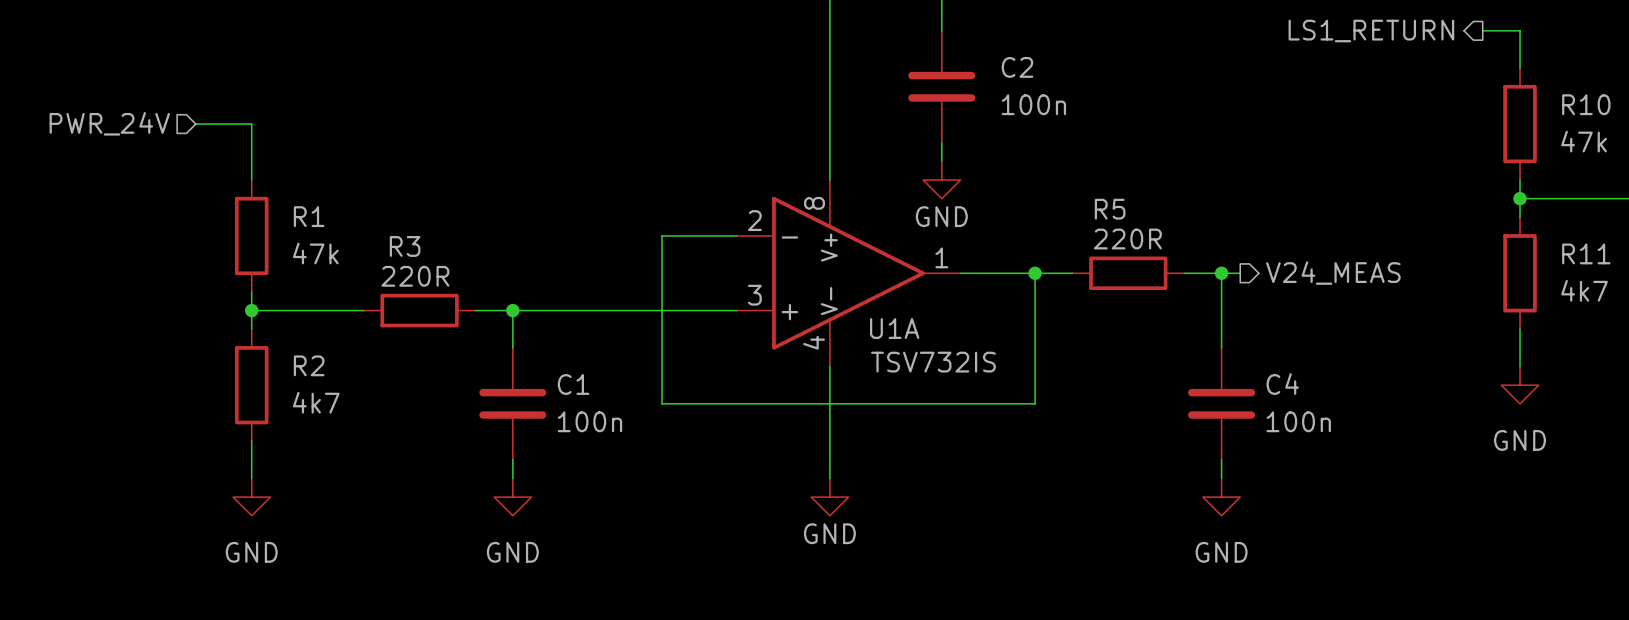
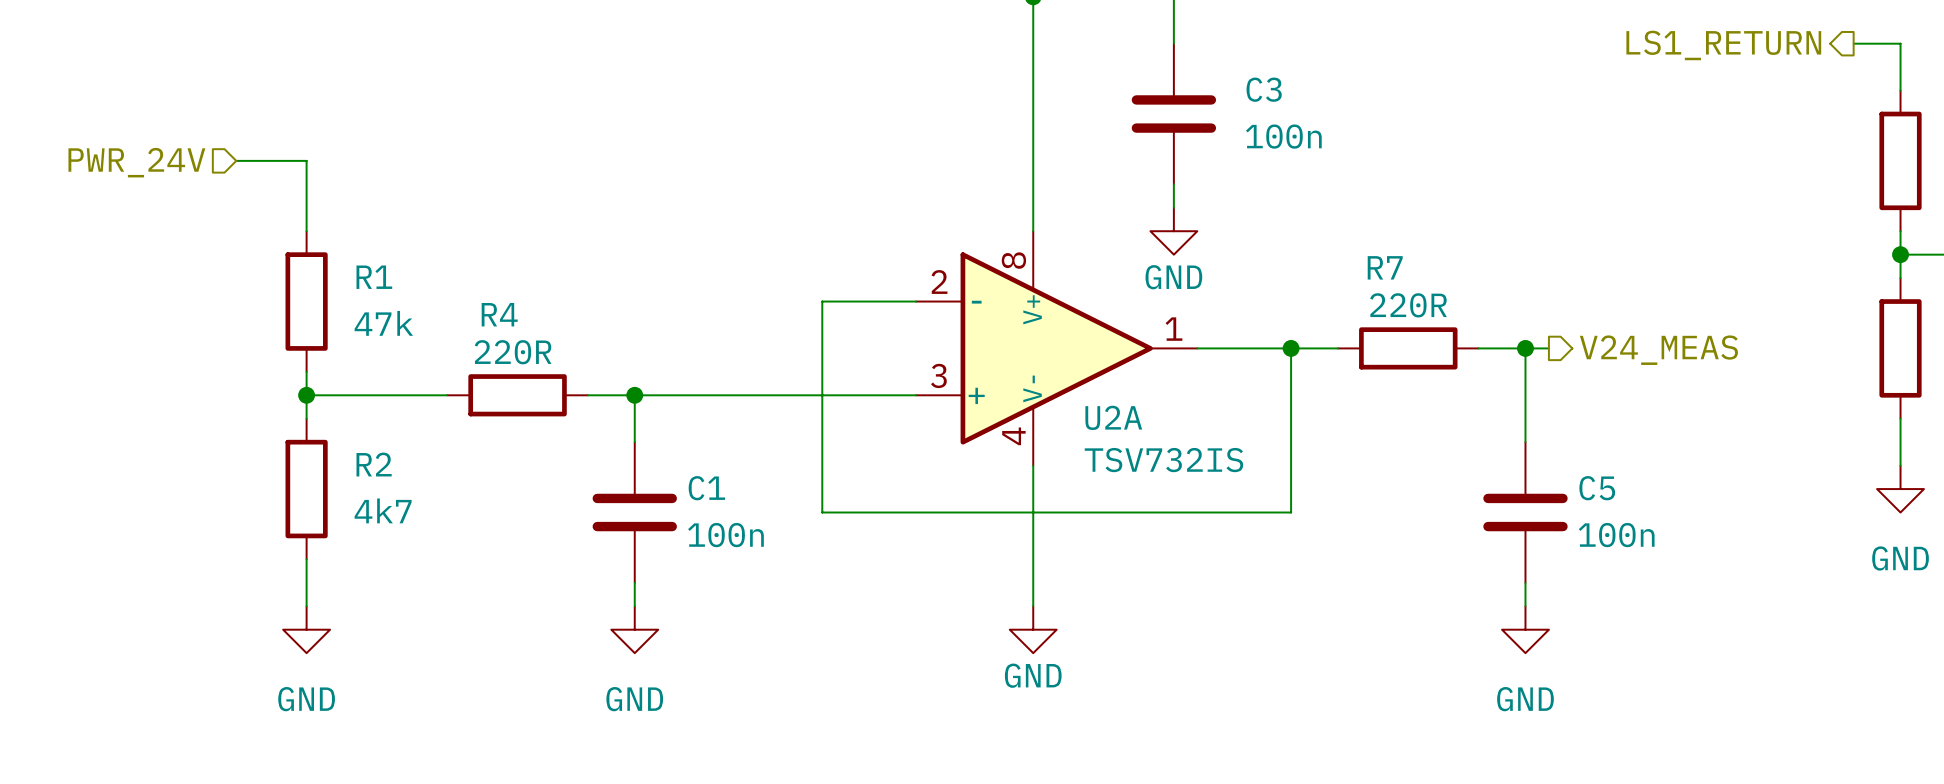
C2 name: C2 (1017, 67) -> C3 (1264, 89)
R5 name: R5 (1110, 209) -> R7 (1385, 267)
R3 name: R3 (405, 246) -> R4 (499, 314)
U1A name: U1A (894, 328) -> U2A (1113, 417)
C4 name: C4 (1282, 384) -> C5 (1597, 488)

